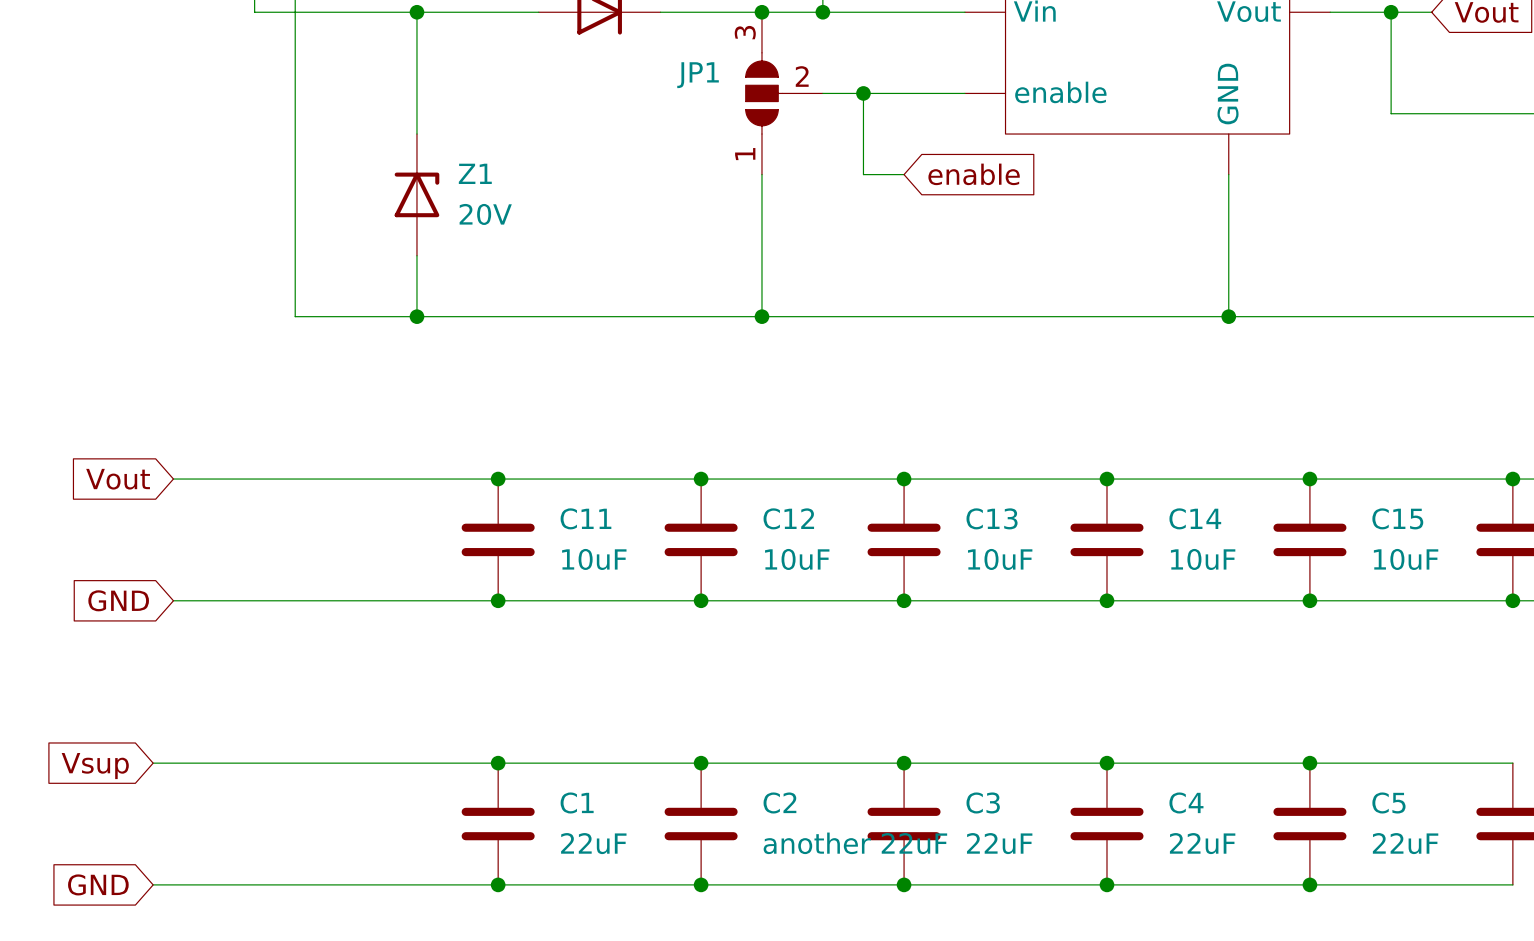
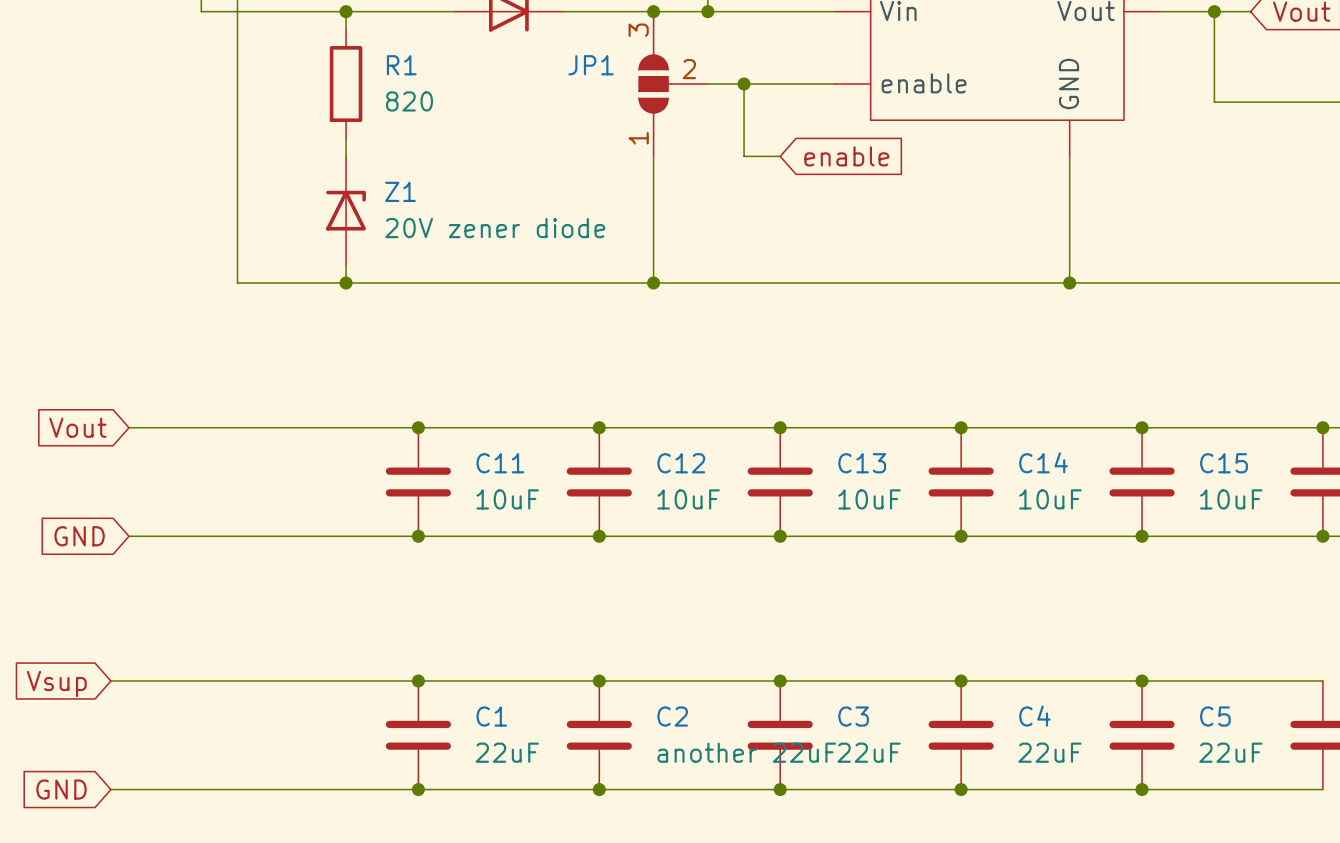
wire: (416, 32) (416, 134) -> none
R1: none -> 820 (346, 84)
Z1 position: (416, 194) -> (346, 210)
Z1 value: 20V (485, 214) -> 20V zener diode (495, 228)

